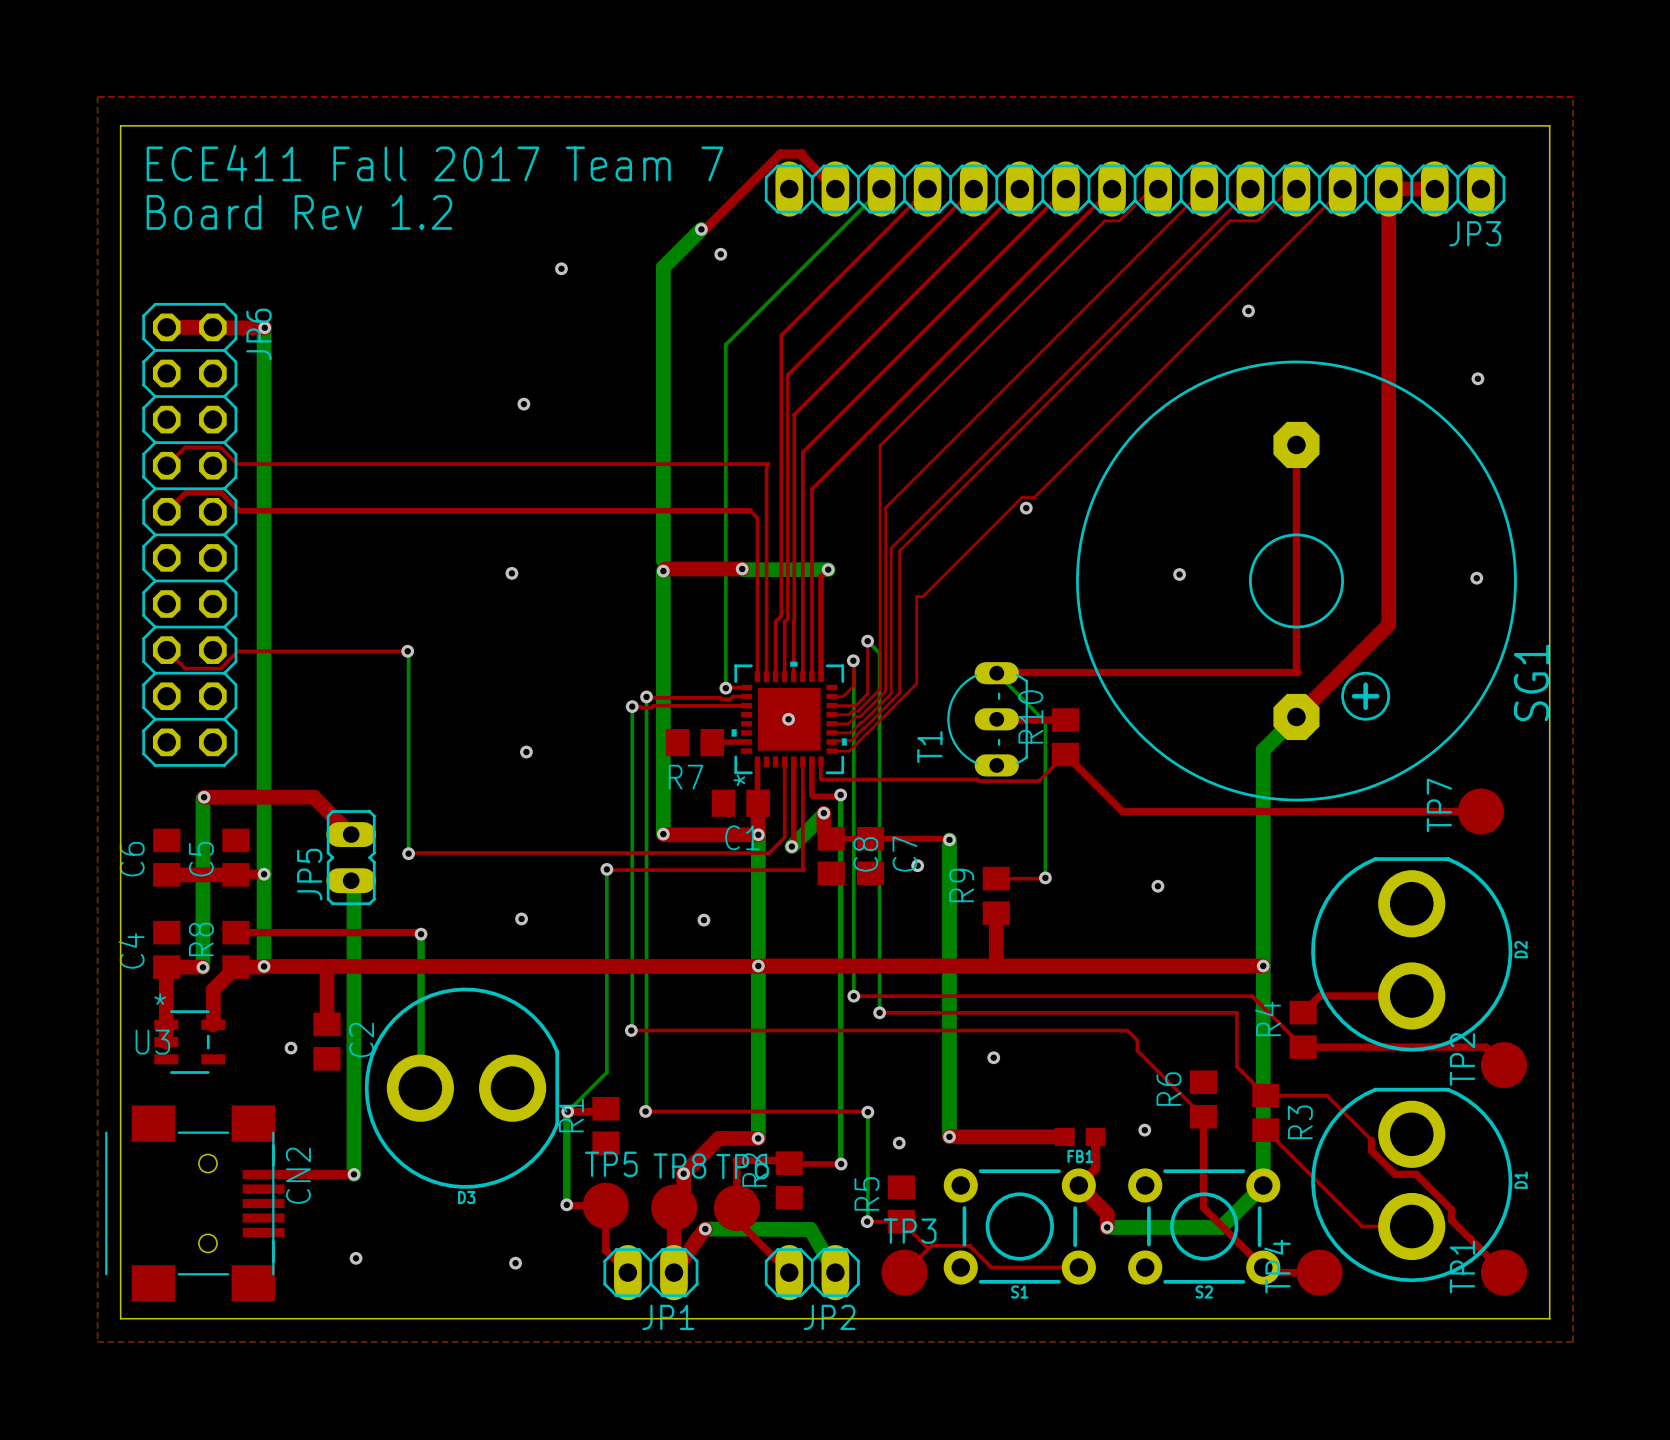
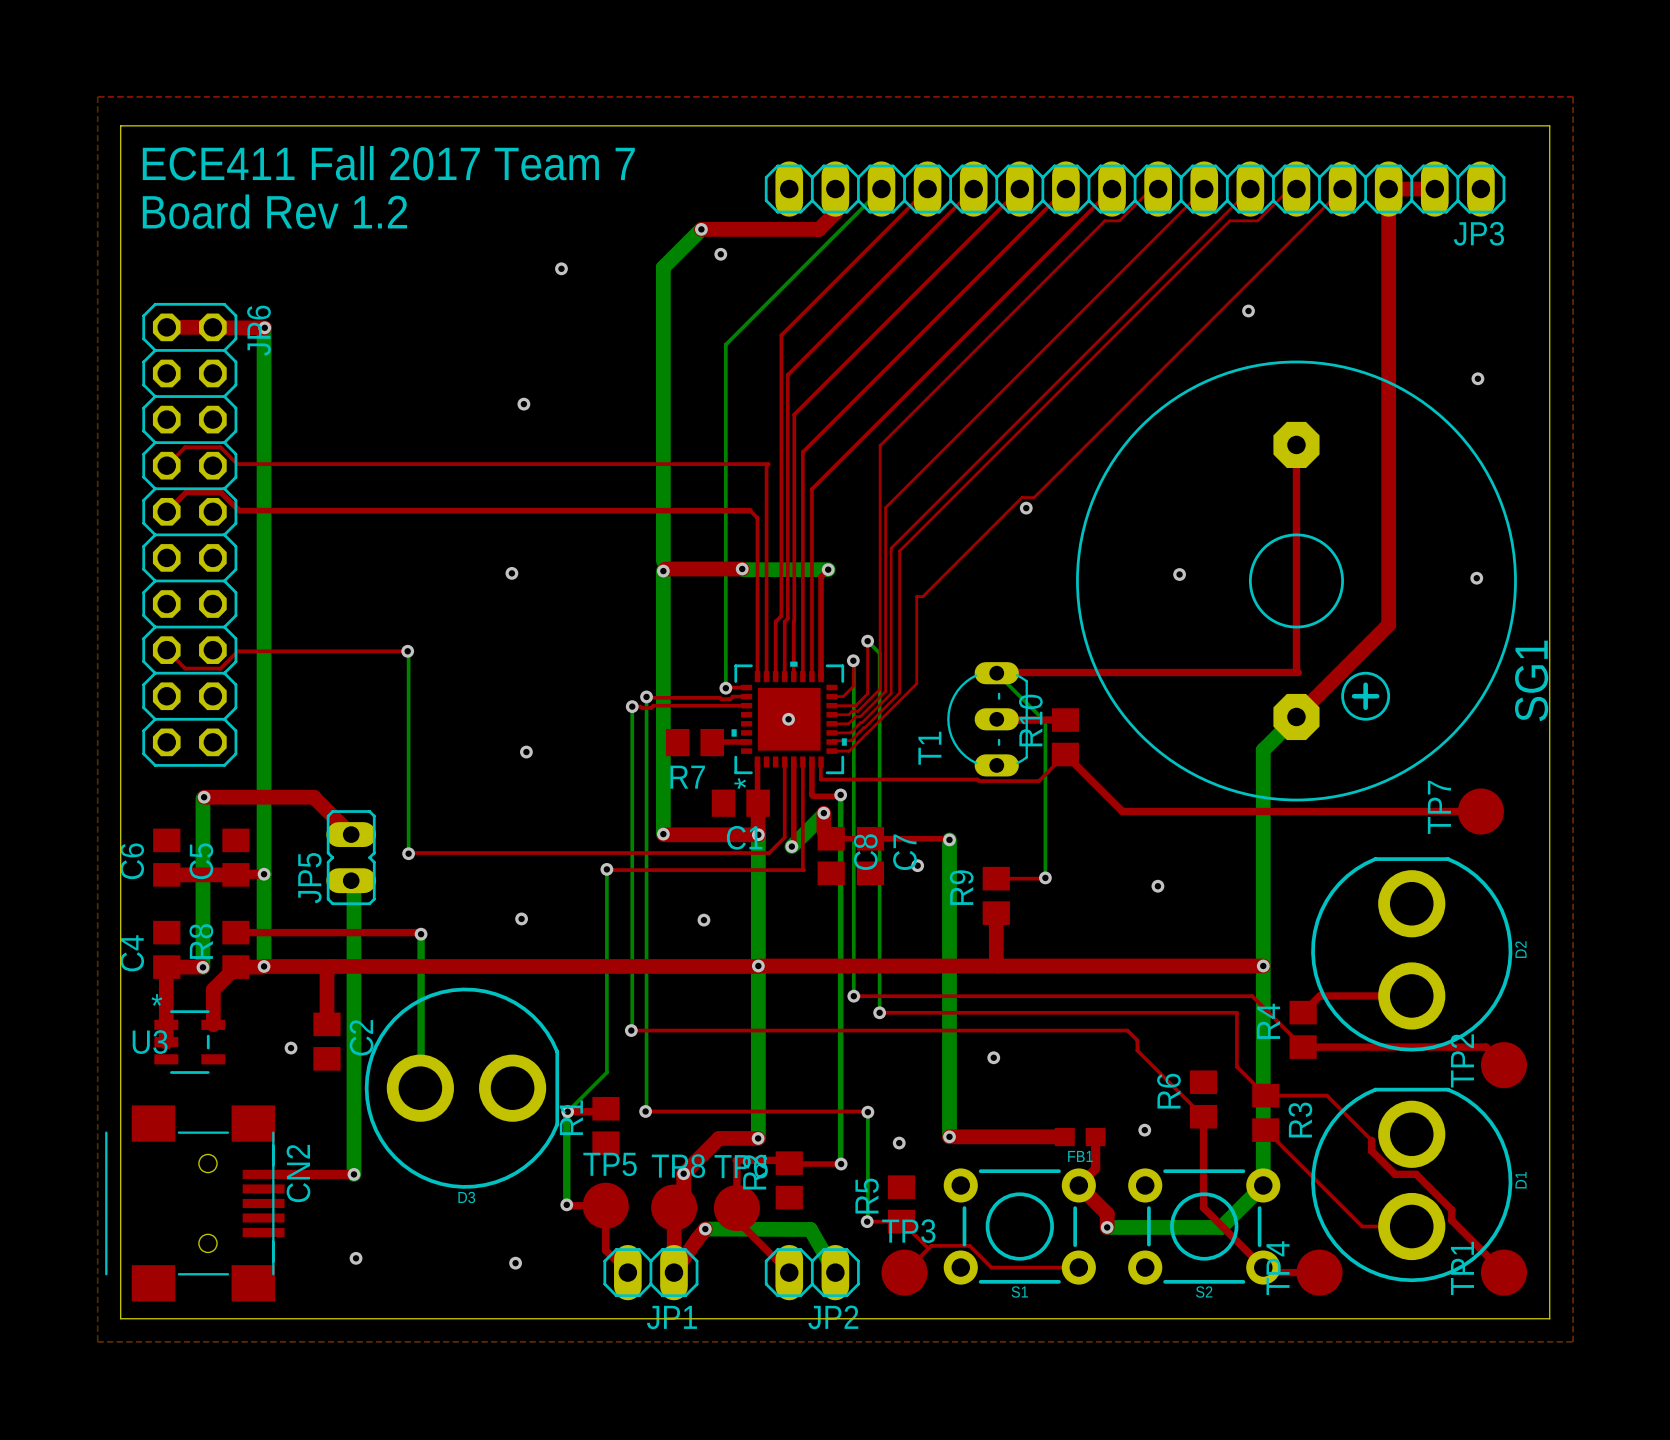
top track: (835, 189) (801, 153) (780, 153) (705, 229) -> (835, 189) (835, 213) (819, 229) (701, 229)

